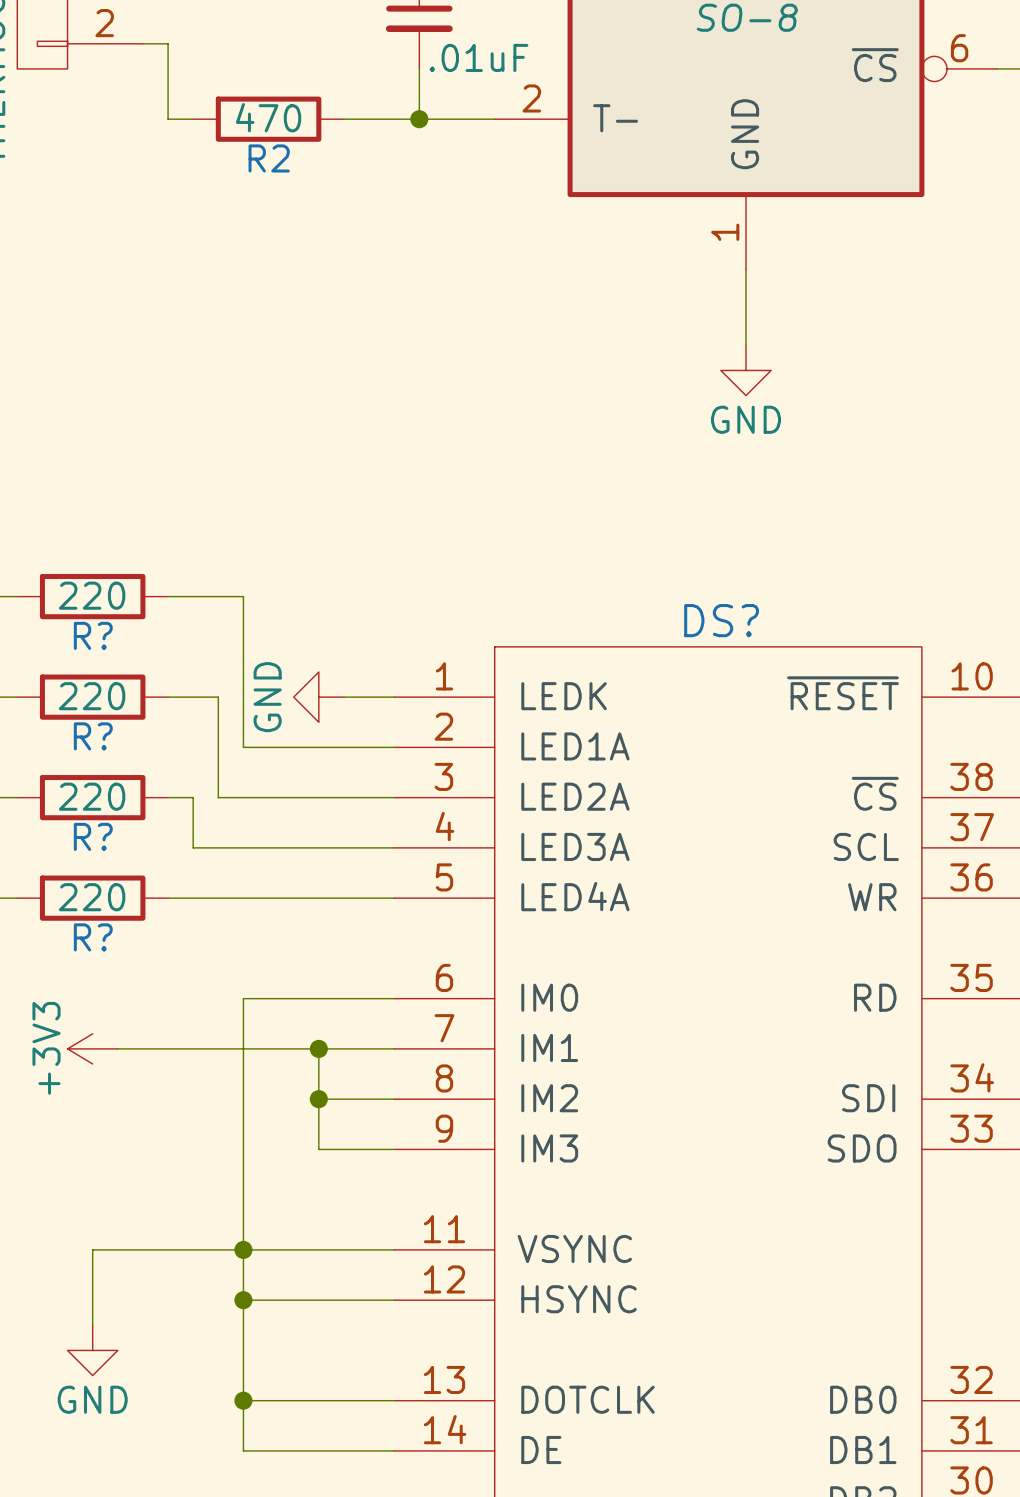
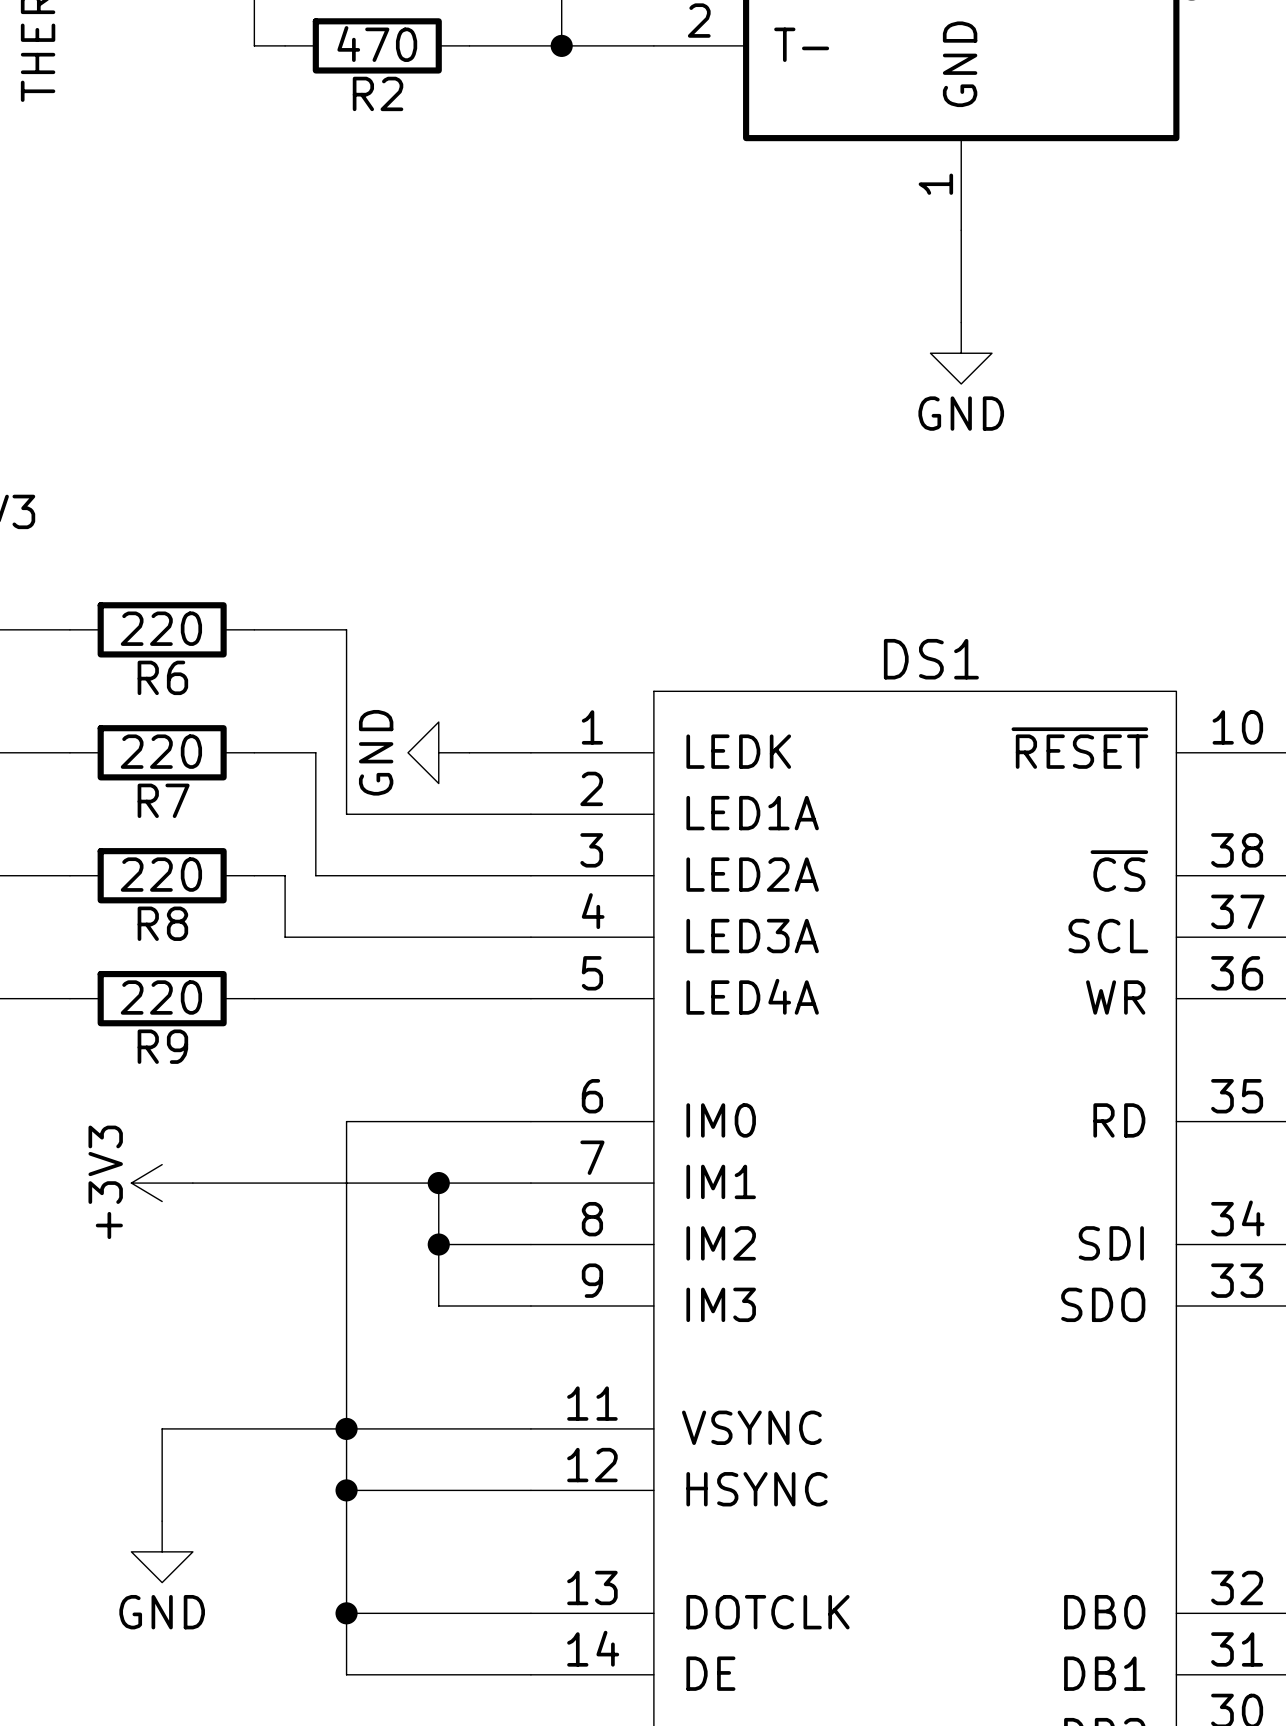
DS? name: DS? (721, 620) -> DS1 (931, 659)
R? name: R? (93, 635) -> R6 (162, 677)
R? name: R? (93, 736) -> R7 (163, 800)
R? name: R? (93, 836) -> R8 (162, 923)
R? name: R? (93, 937) -> R9 (162, 1046)

